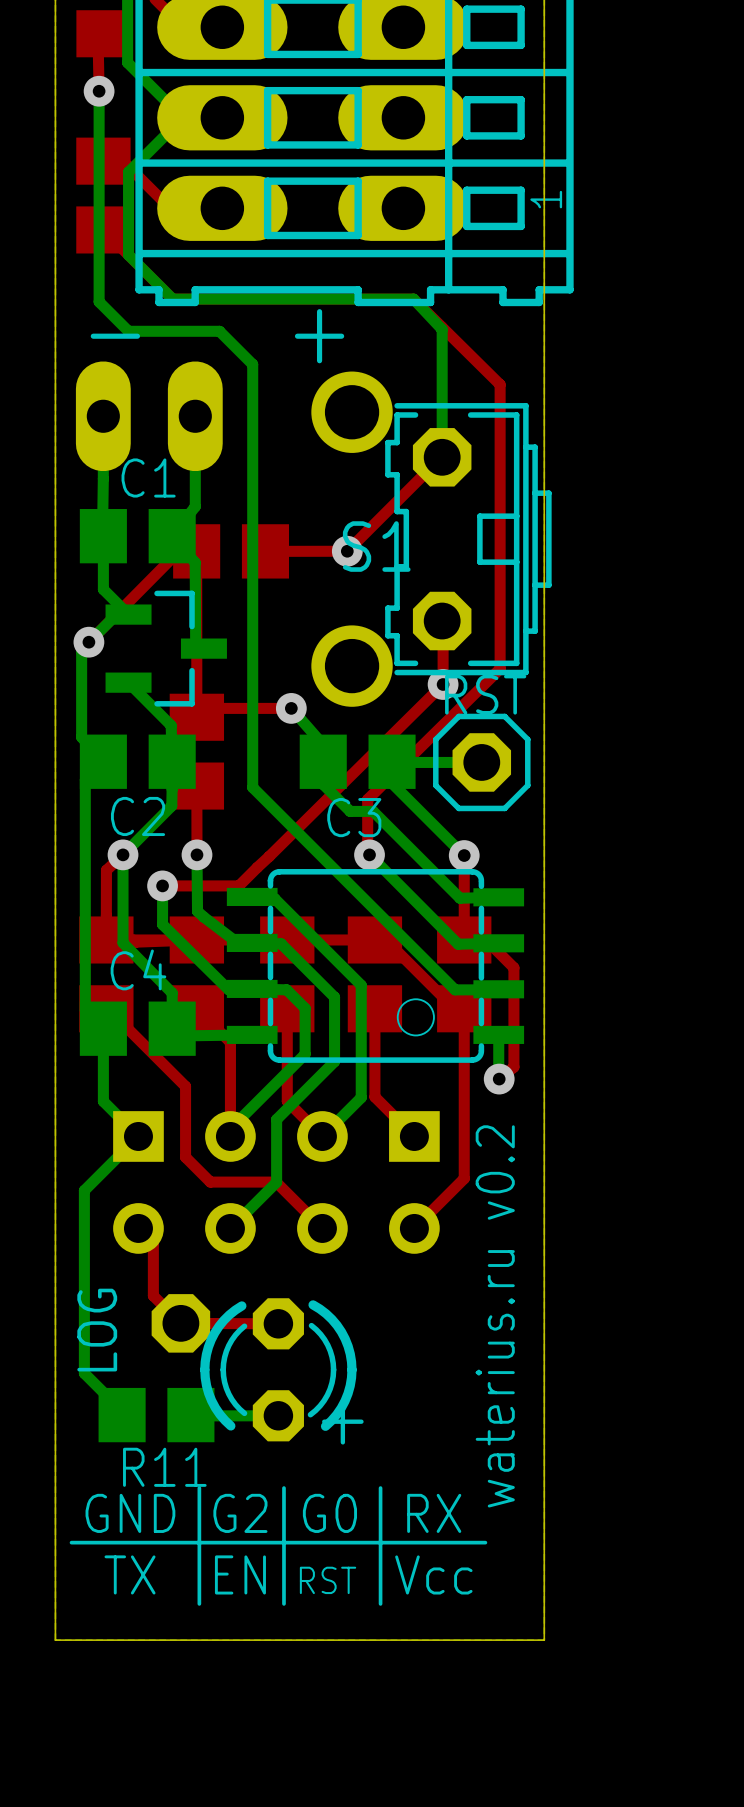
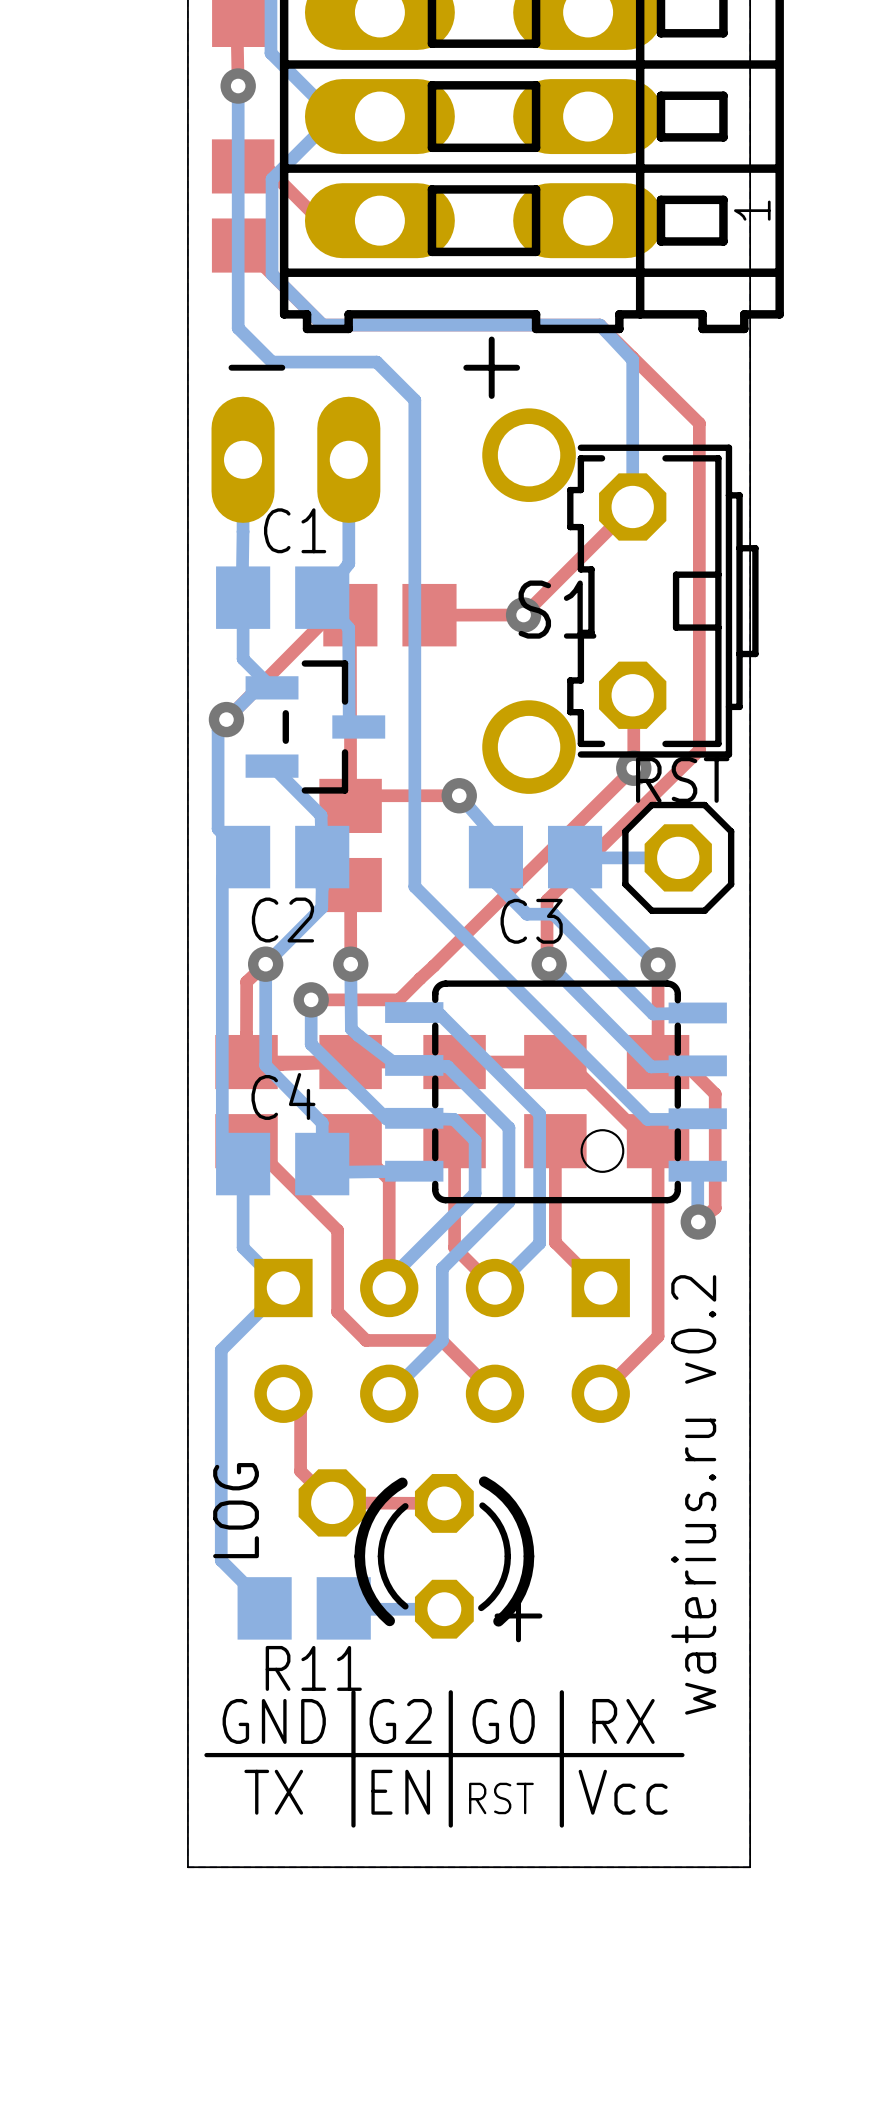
part footprint: [105, 590, 227, 707] -> [245, 660, 386, 794]

